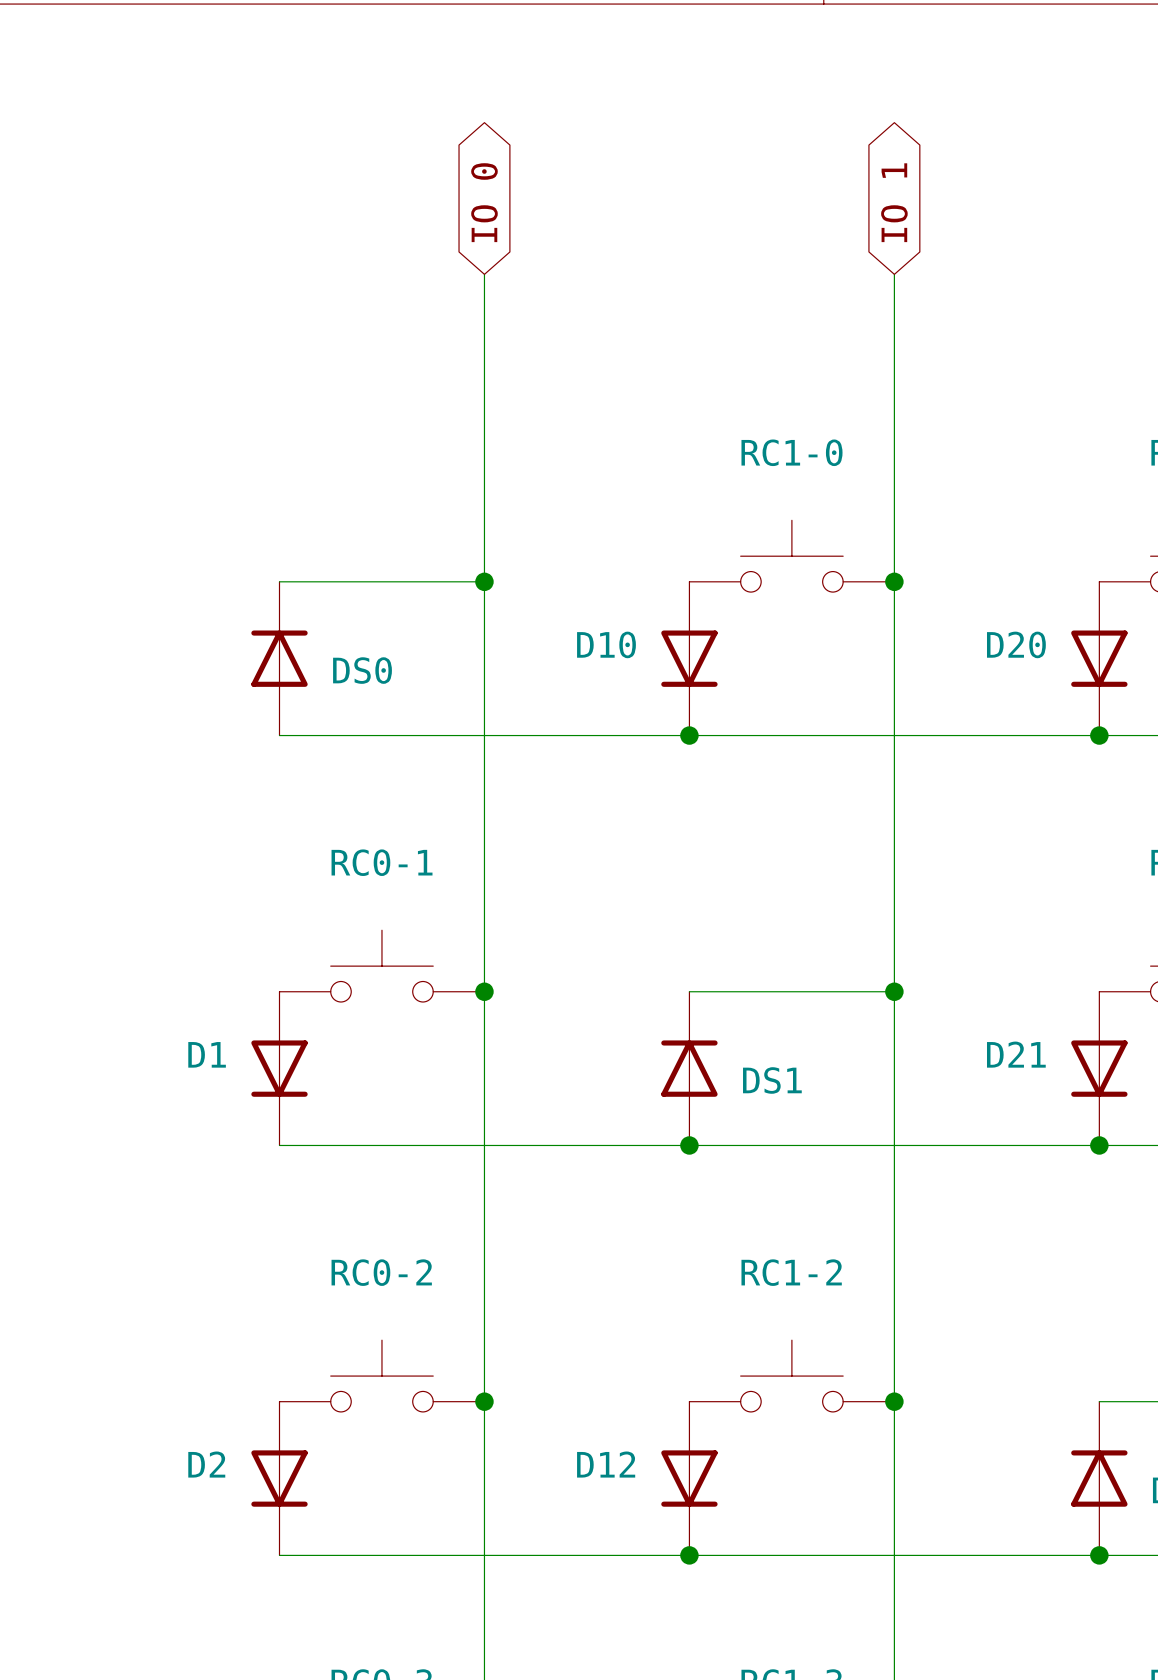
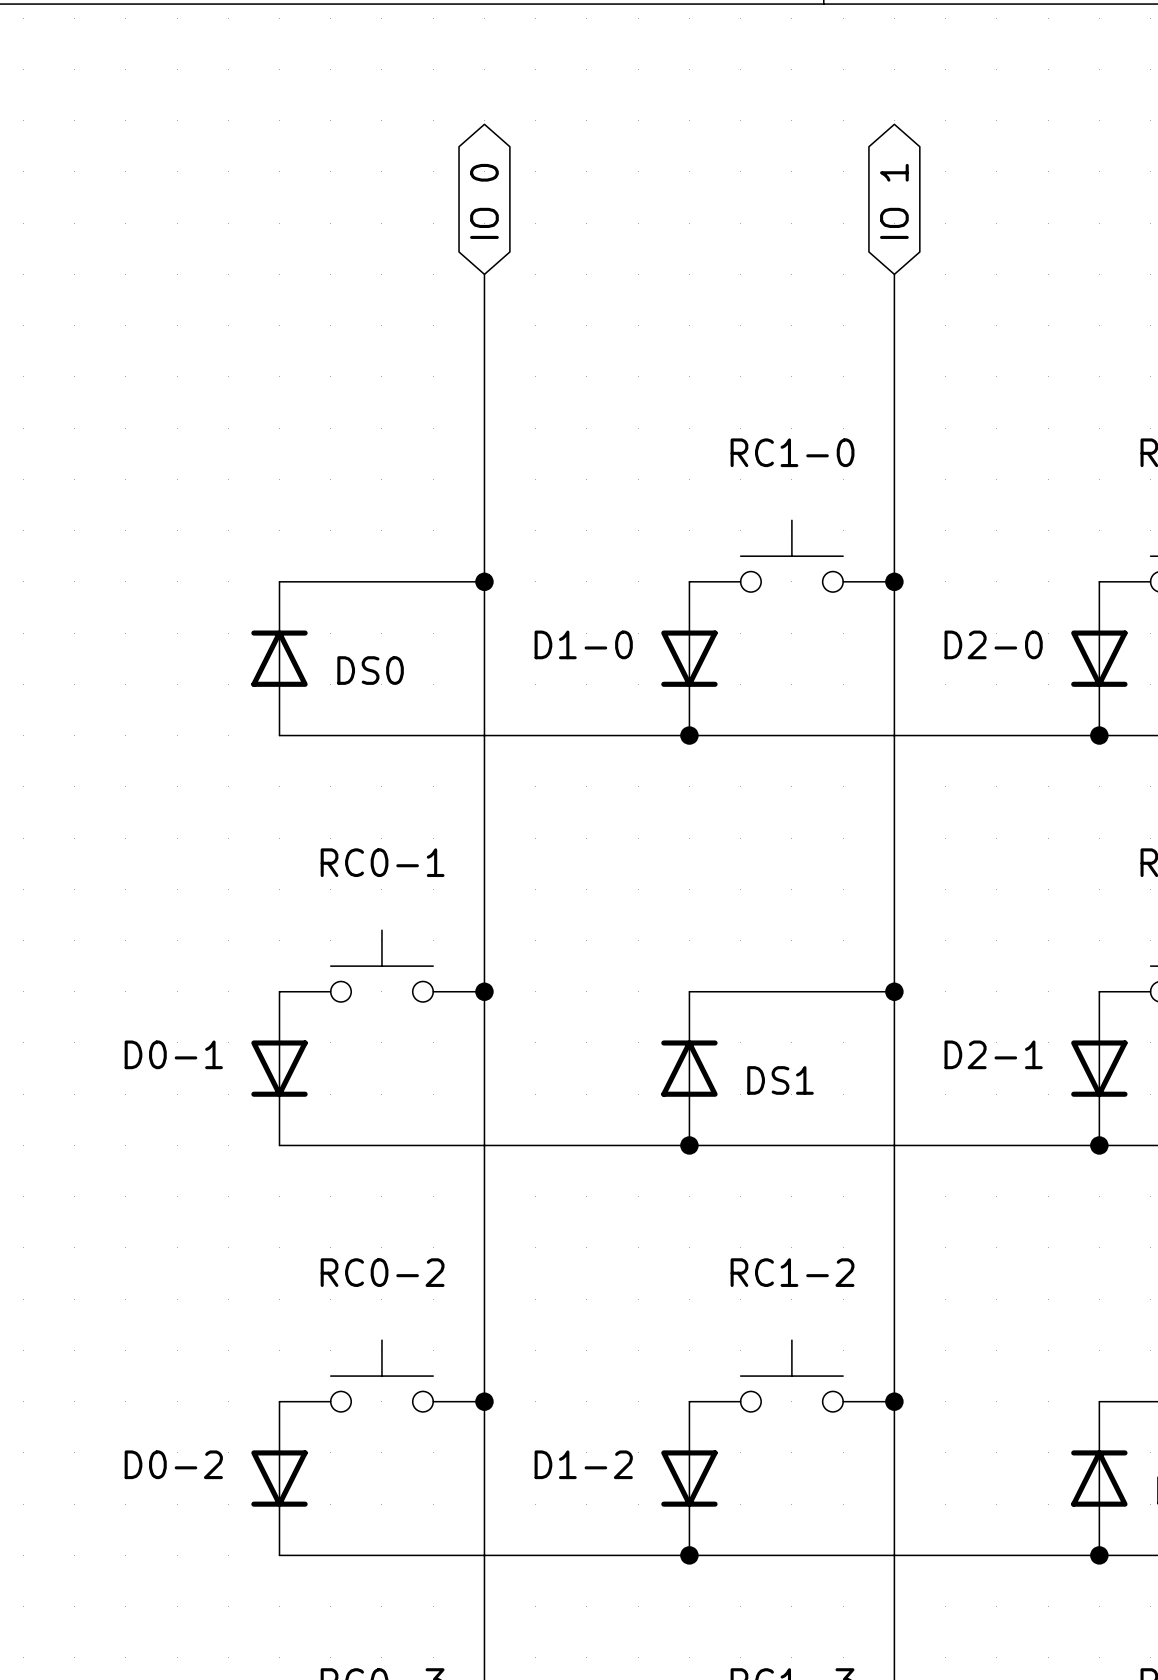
D10 name: D10 (606, 644) -> D1-0 (583, 644)
D20 name: D20 (1016, 644) -> D2-0 (993, 644)
D1 name: D1 (207, 1054) -> D0-1 (173, 1054)
D21 name: D21 (1016, 1054) -> D2-1 (993, 1054)
D2 name: D2 (206, 1464) -> D0-2 (173, 1464)
D12 name: D12 (606, 1464) -> D1-2 (583, 1464)

